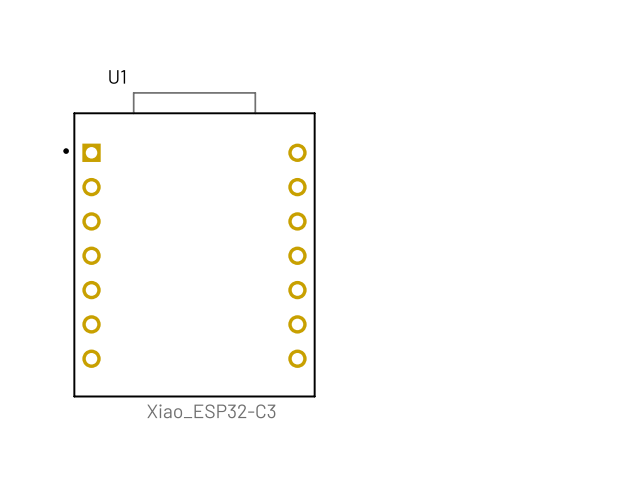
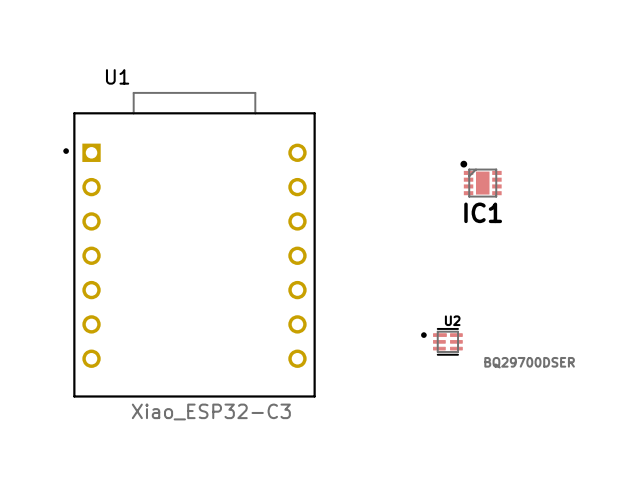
IC1: none -> (481, 179)
U2: none -> BQ29700DSER (441, 341)

